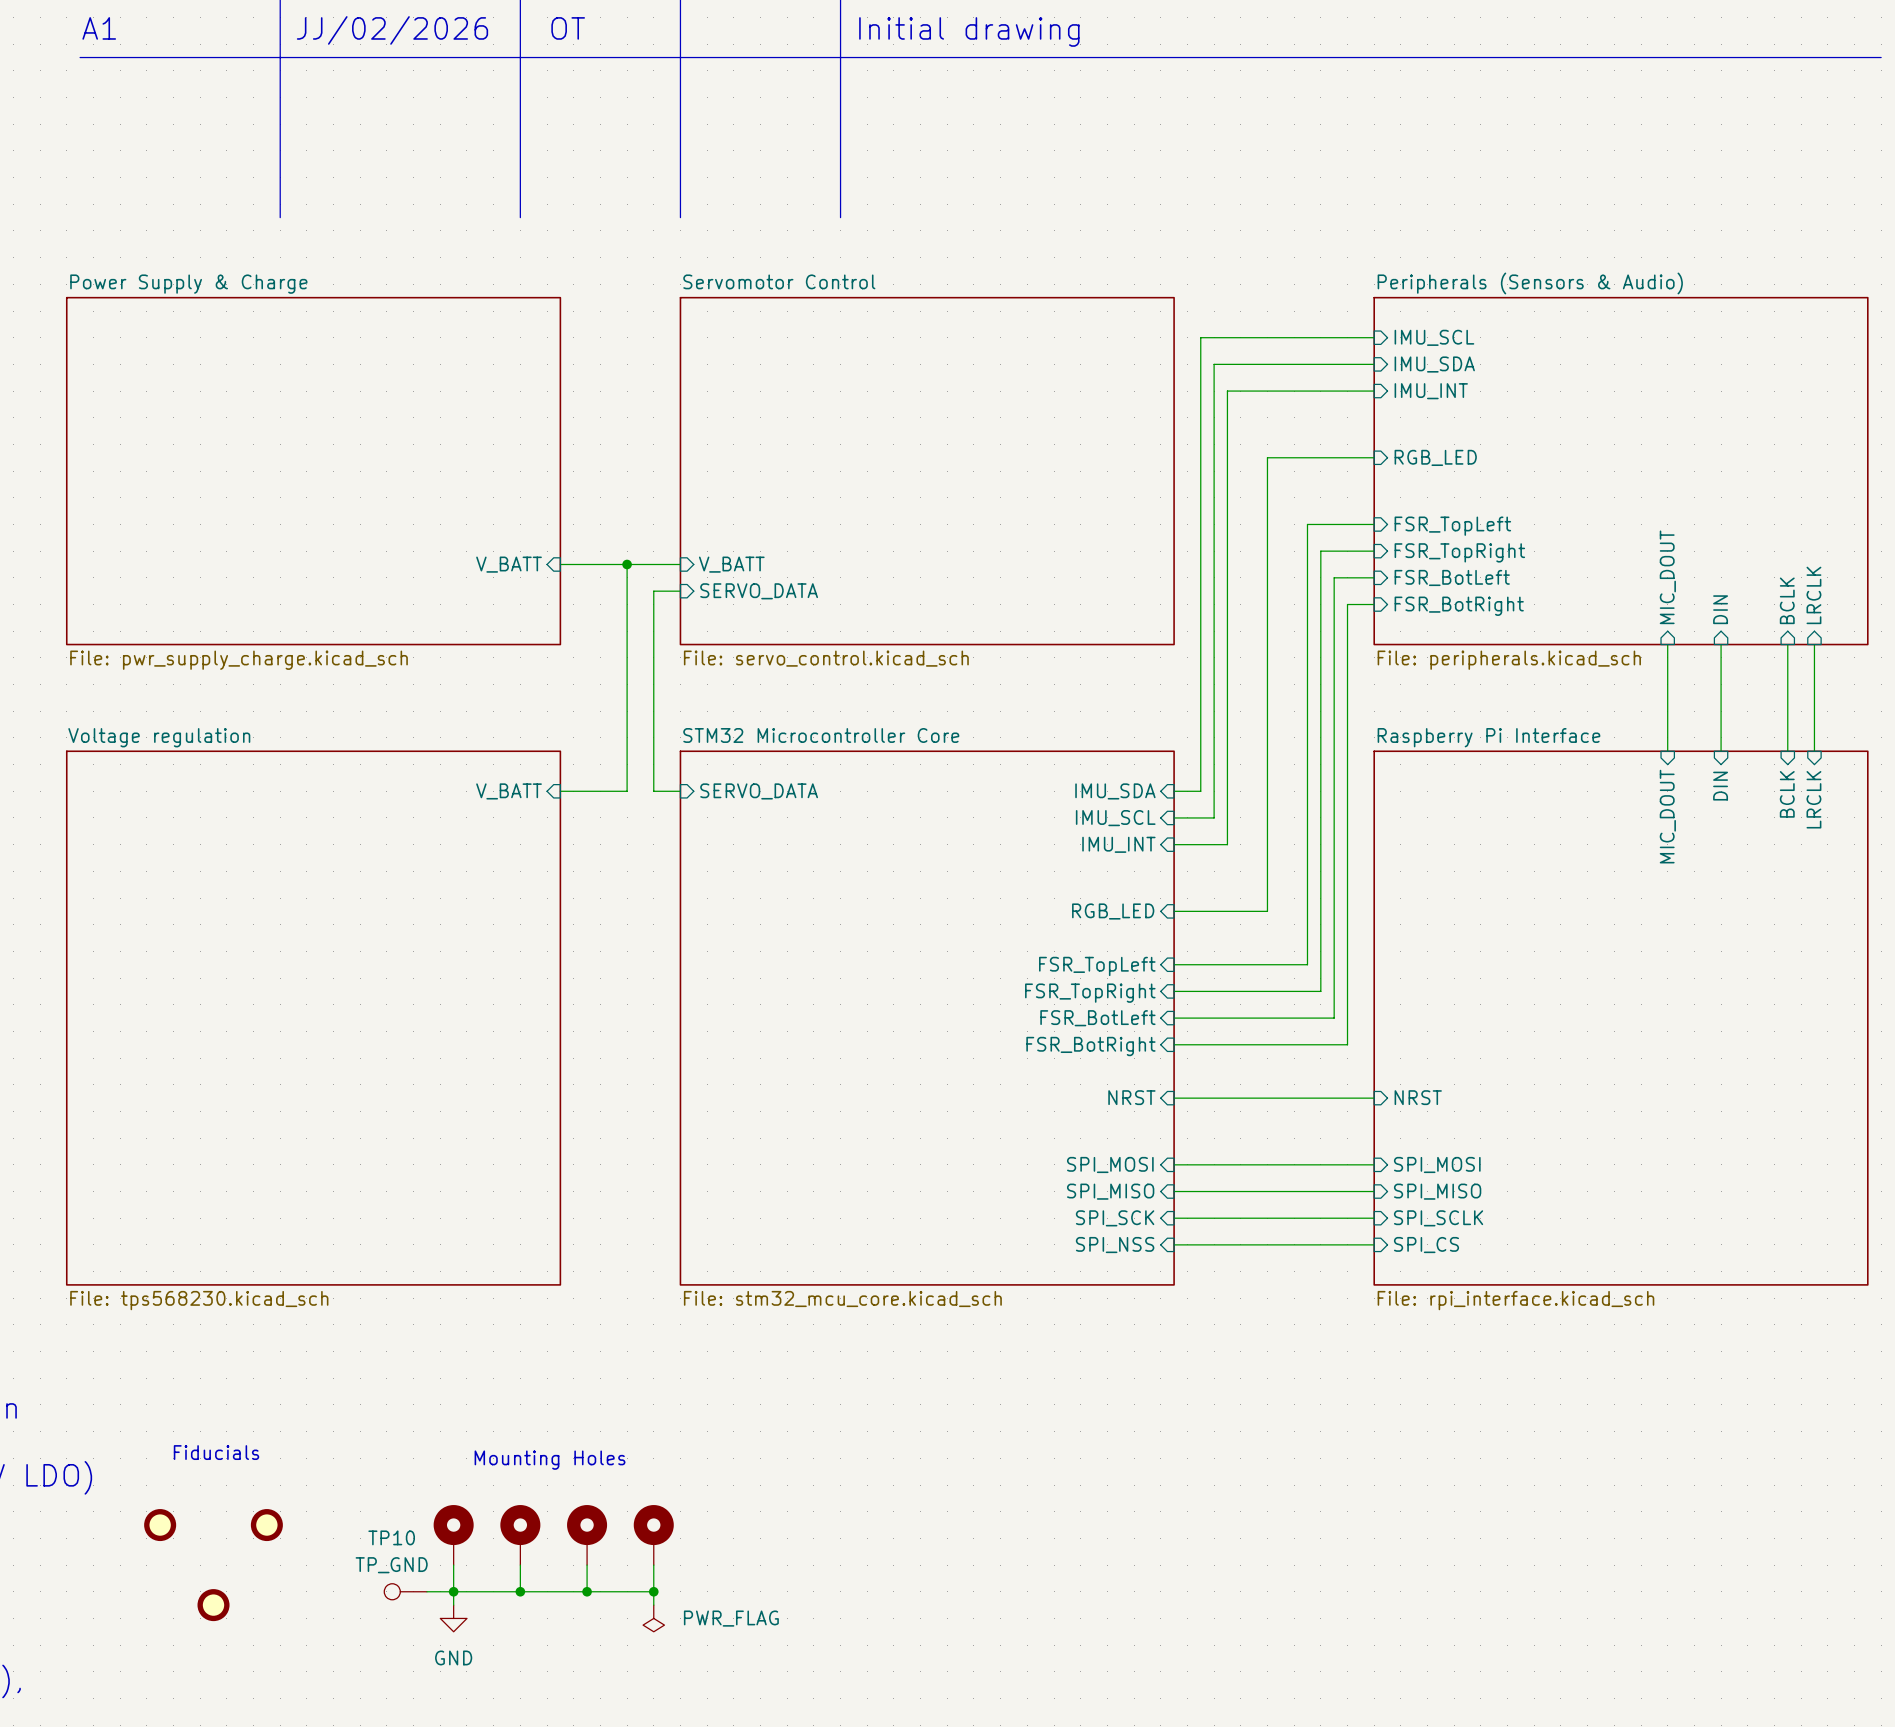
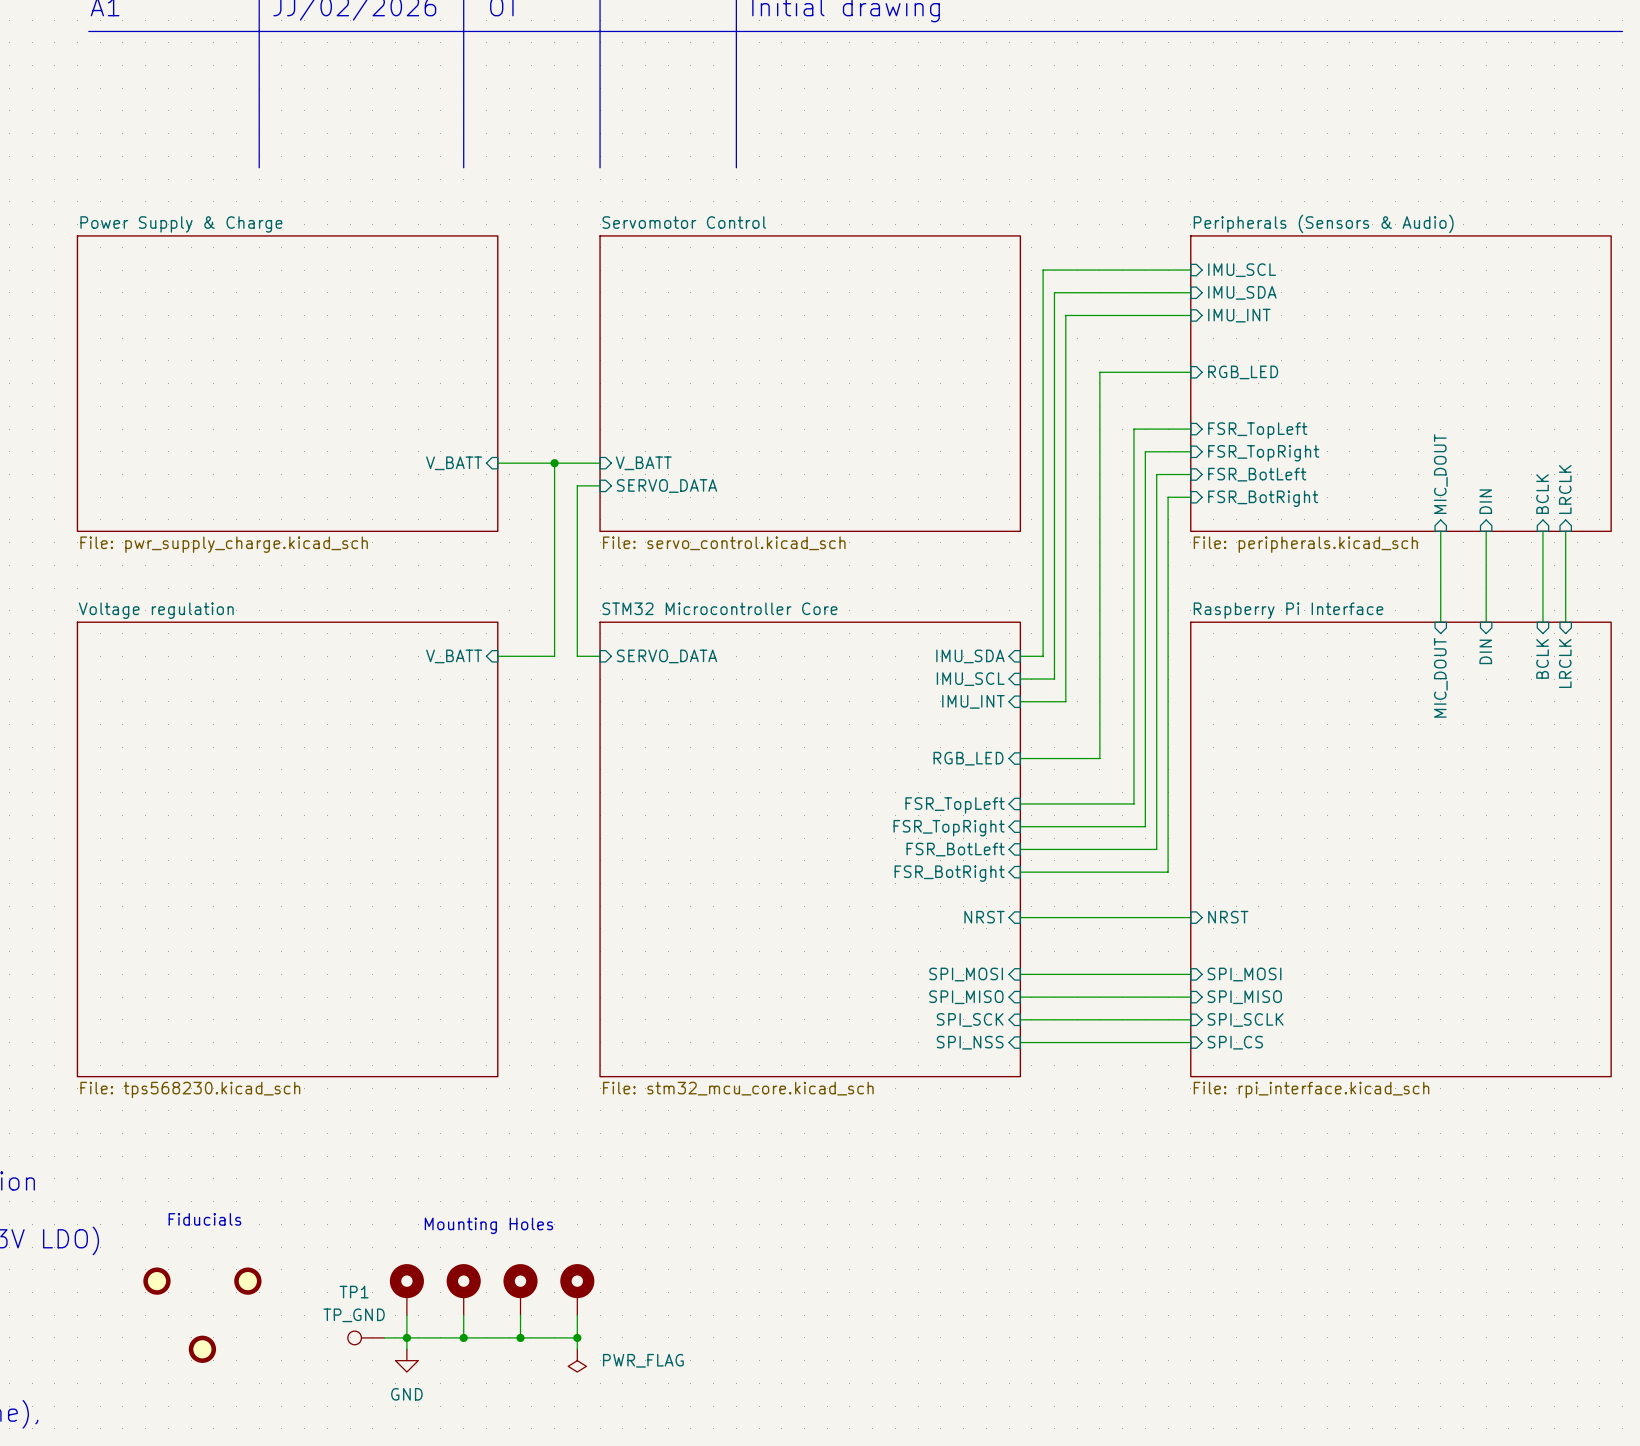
TP10 name: TP10 (391, 1537) -> TP1 (354, 1292)

